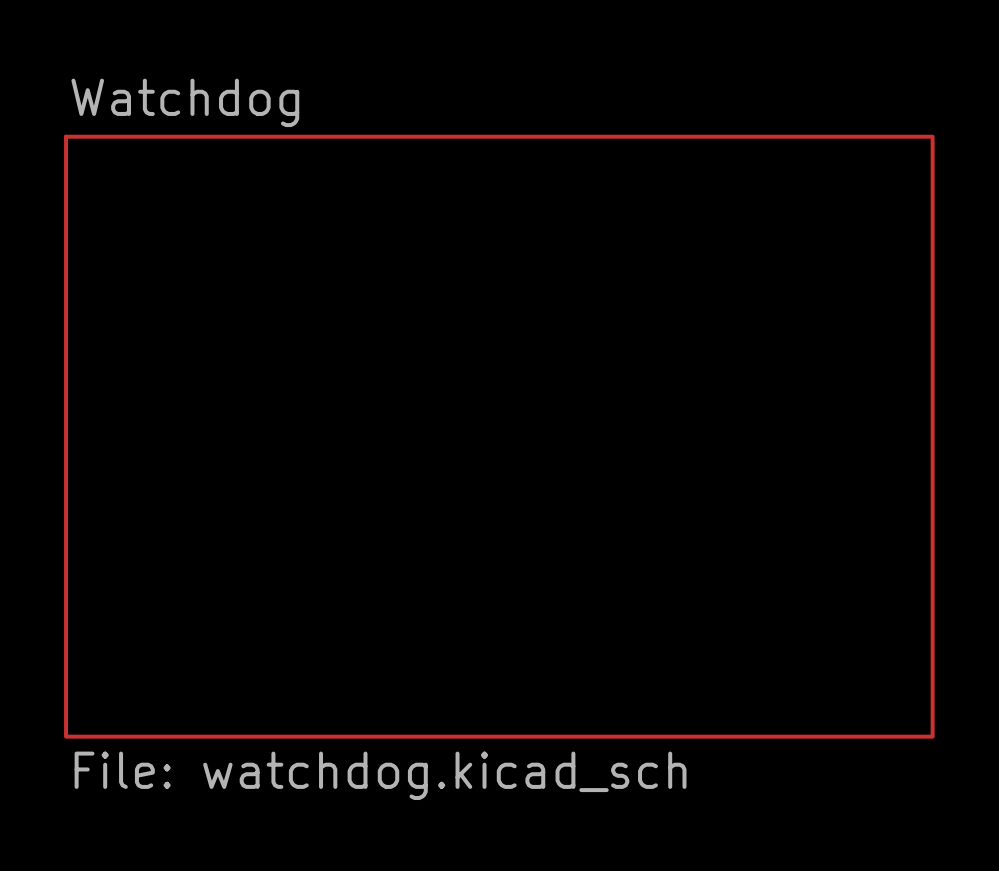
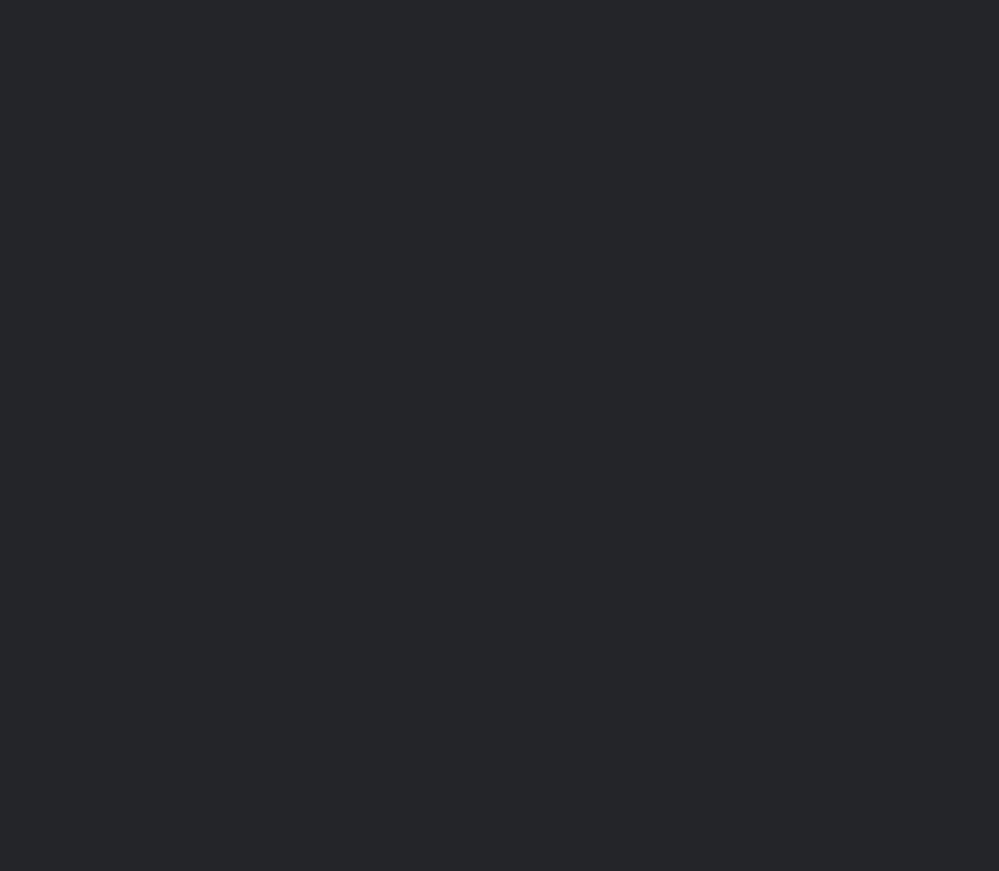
sheet Watchdog: File: watchdog.kicad_sch (499, 436) -> none

